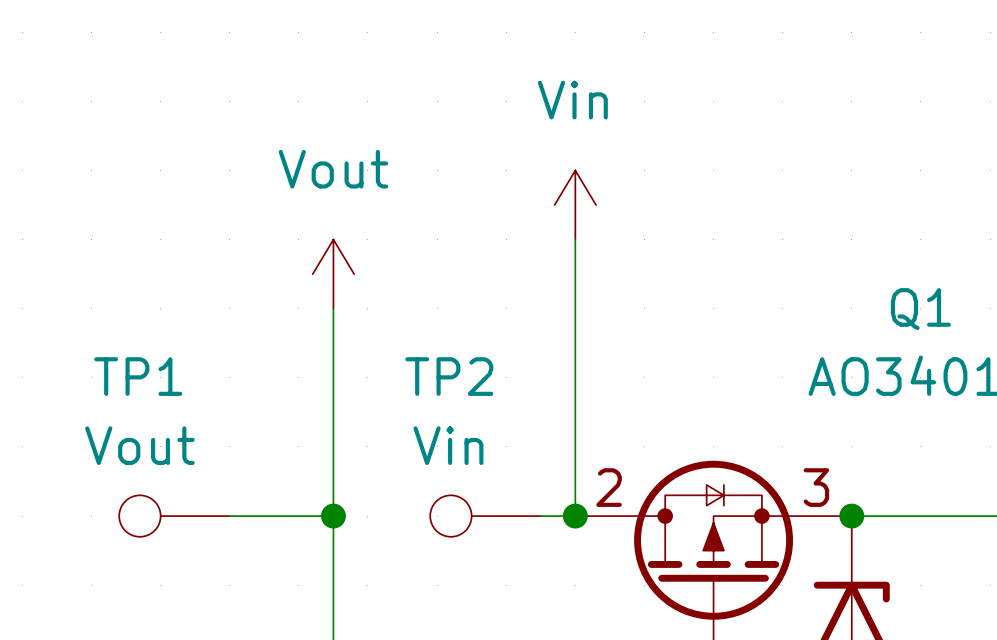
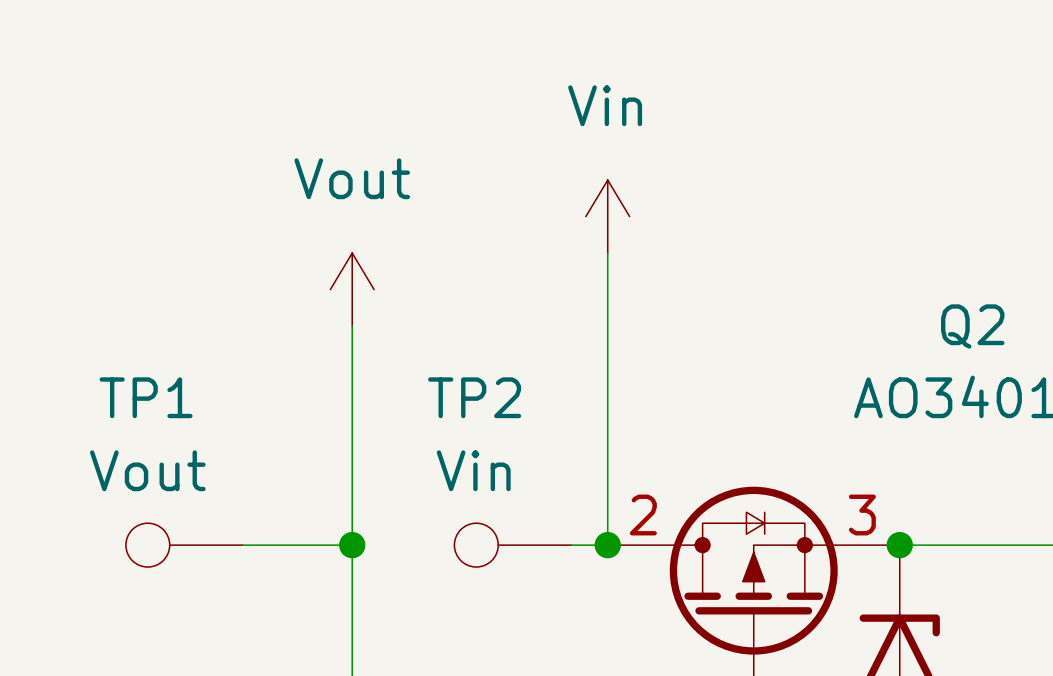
Q1 name: Q1 (920, 309) -> Q2 (972, 326)

